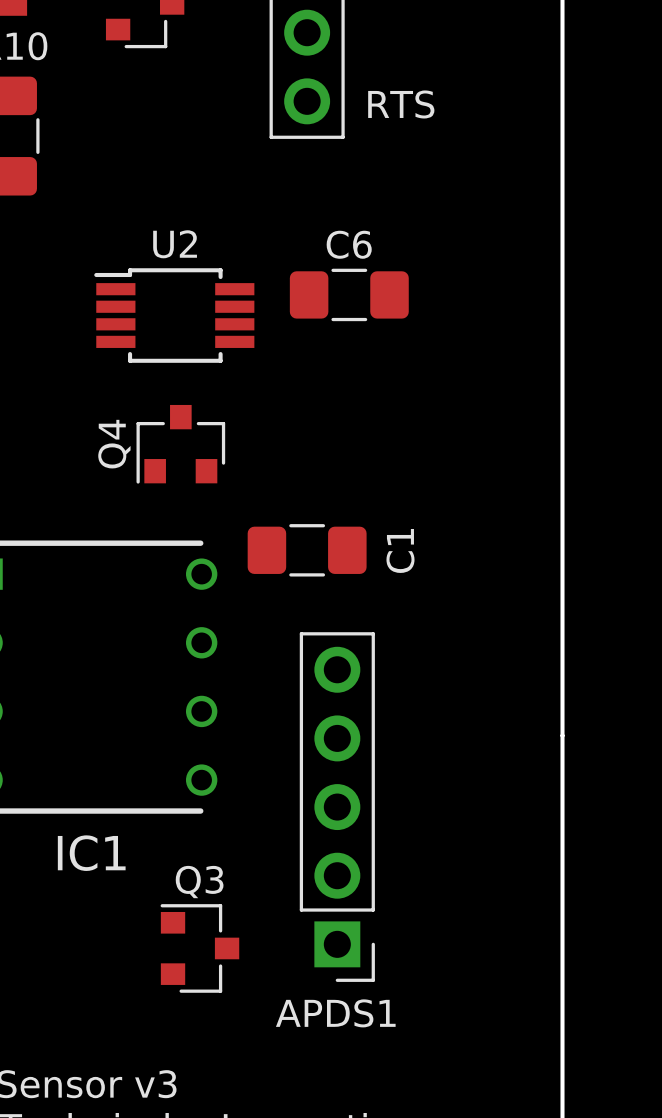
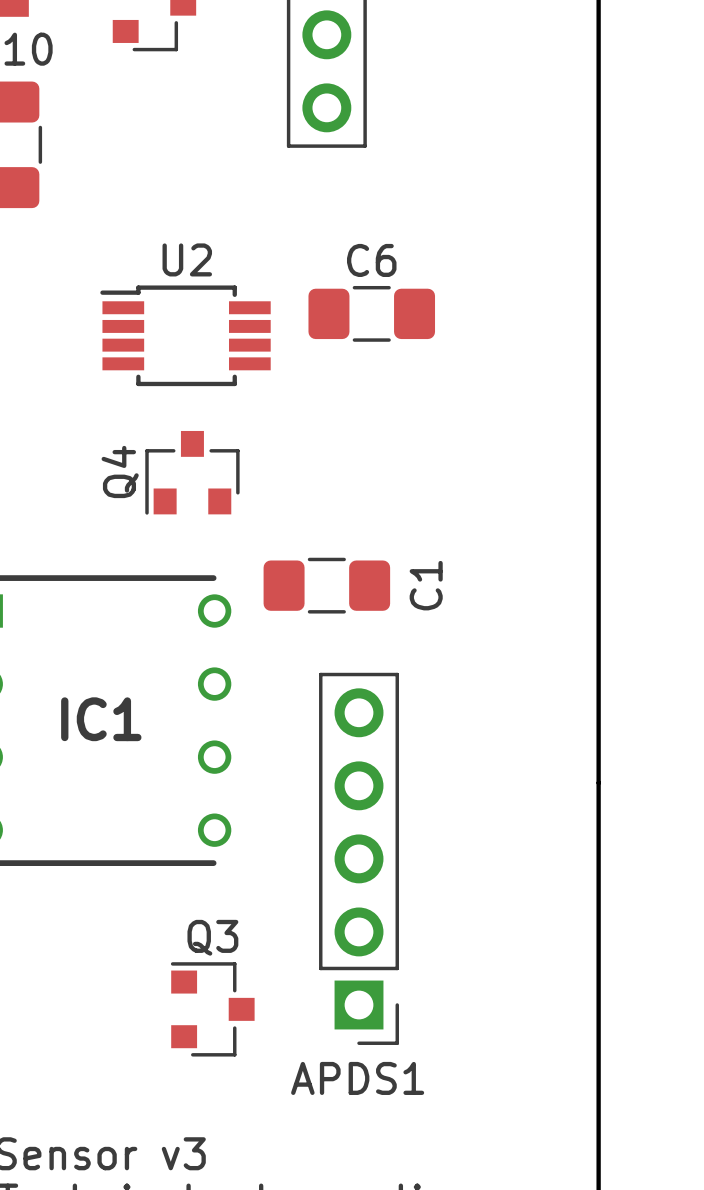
text: RTS (401, 104) -> none
IC1 name position: IC1 (91, 853) -> IC1 (101, 719)

